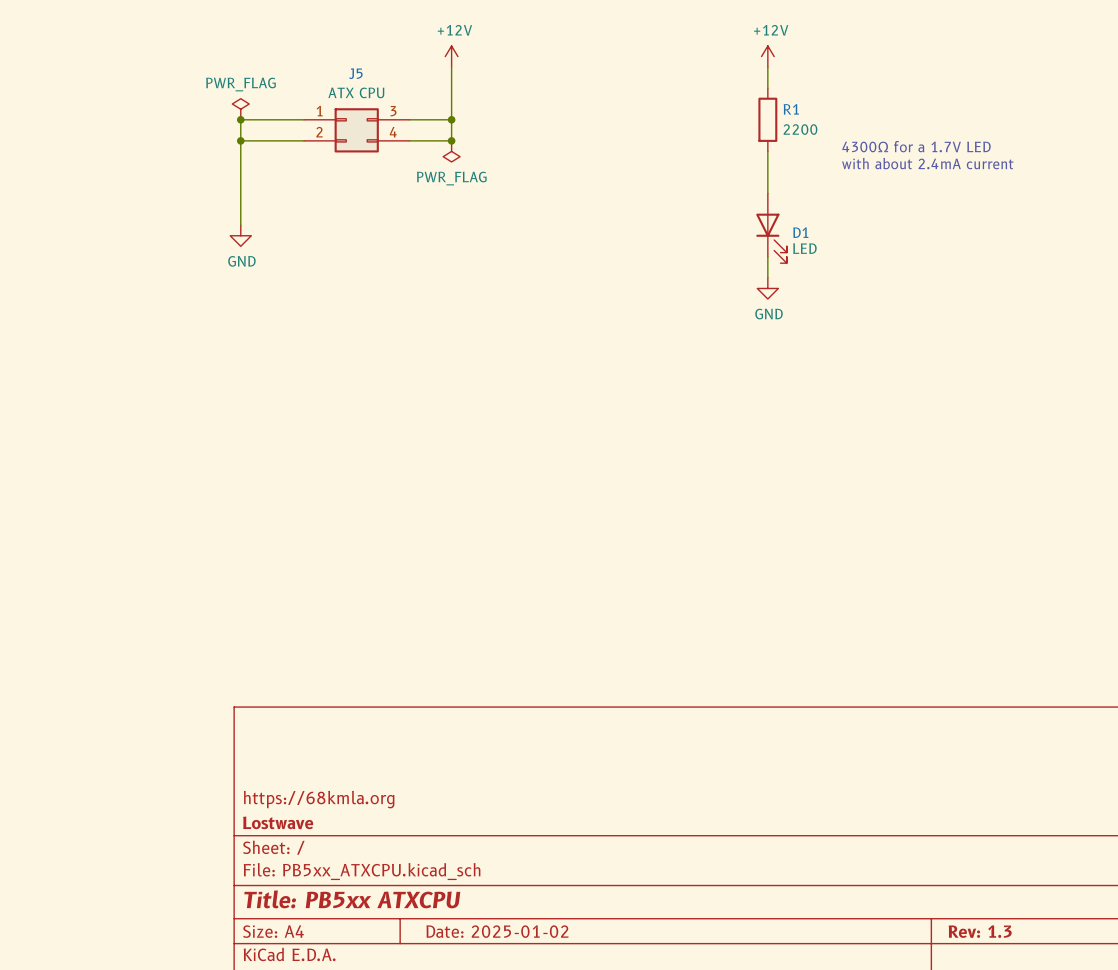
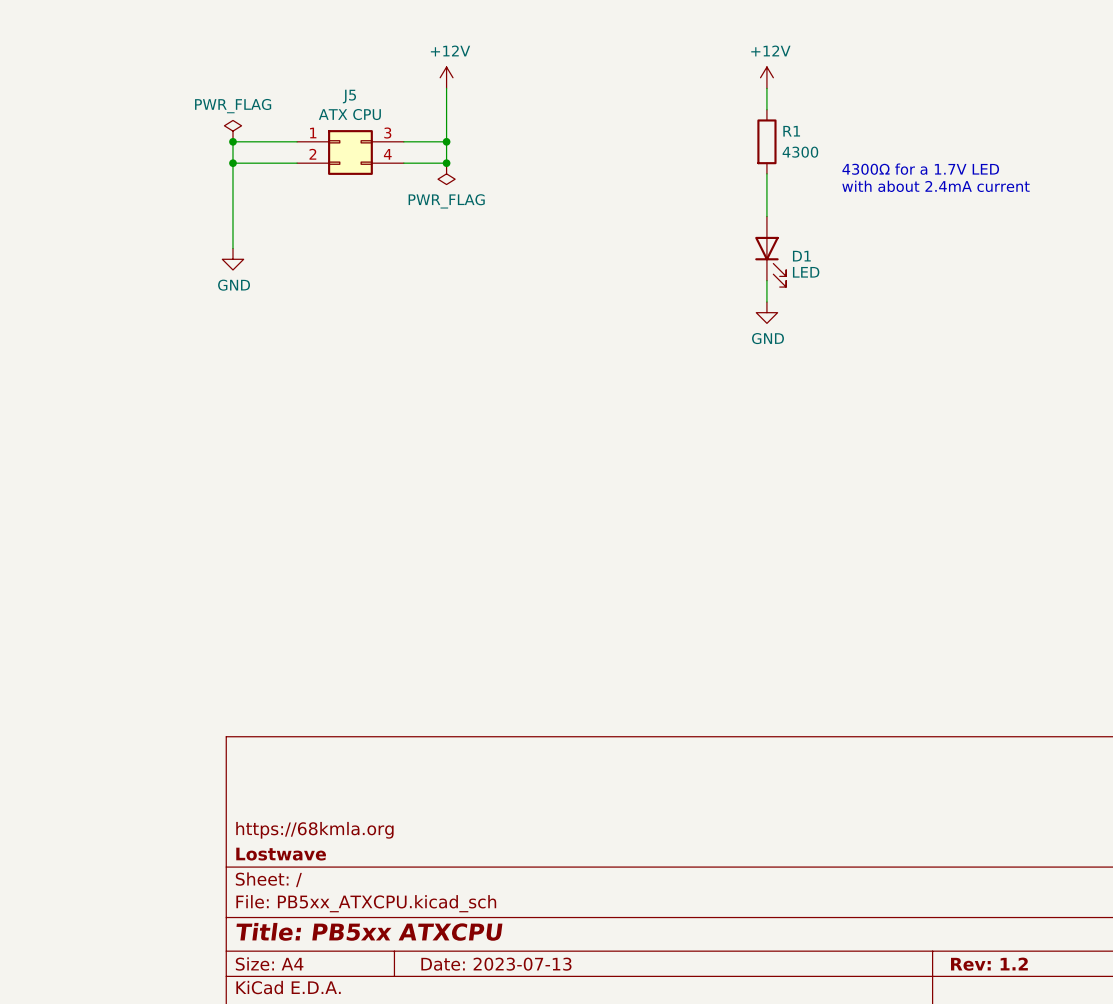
R1 value: 2200 (800, 129) -> 4300 (800, 152)
title block: Date: 2025-01-02 (497, 931) -> Date: 2023-07-13 (496, 964)
title block: Rev: 1.3 (980, 931) -> Rev: 1.2 (989, 964)

